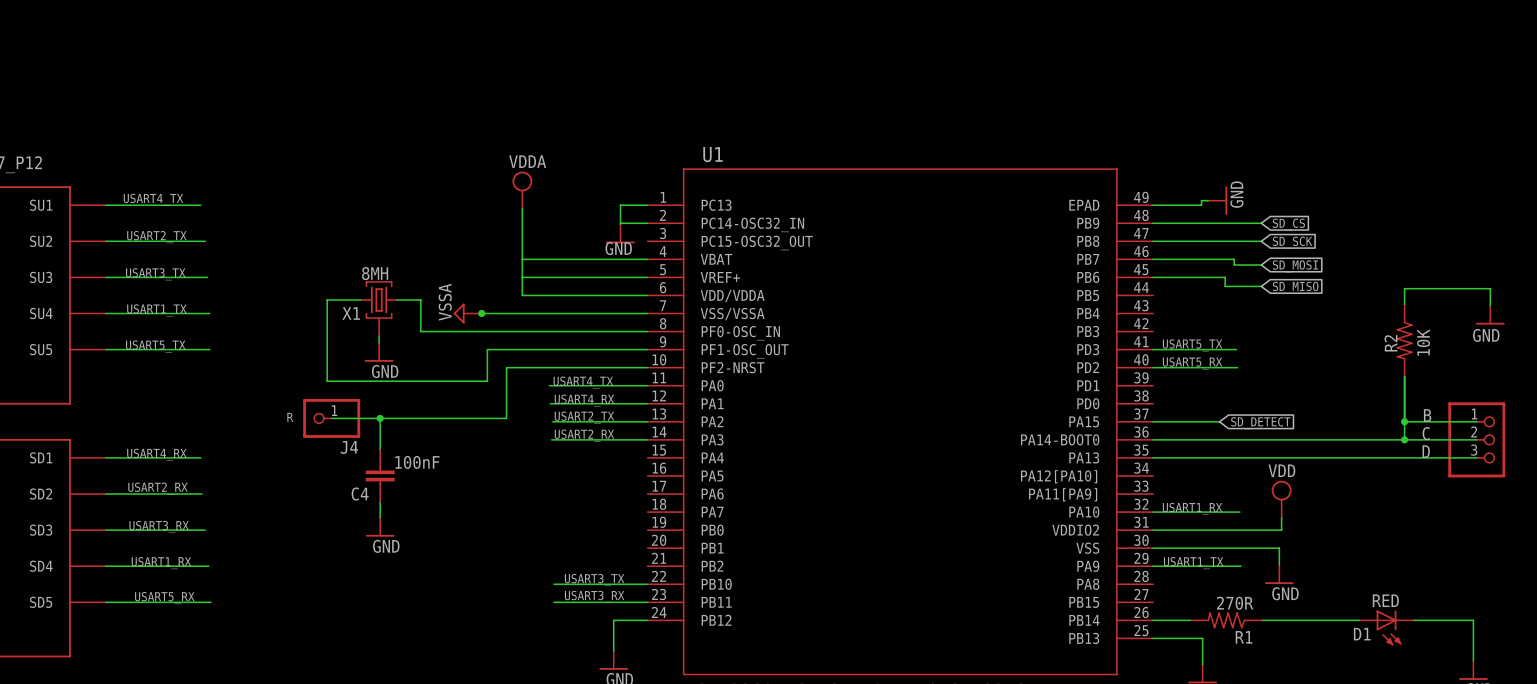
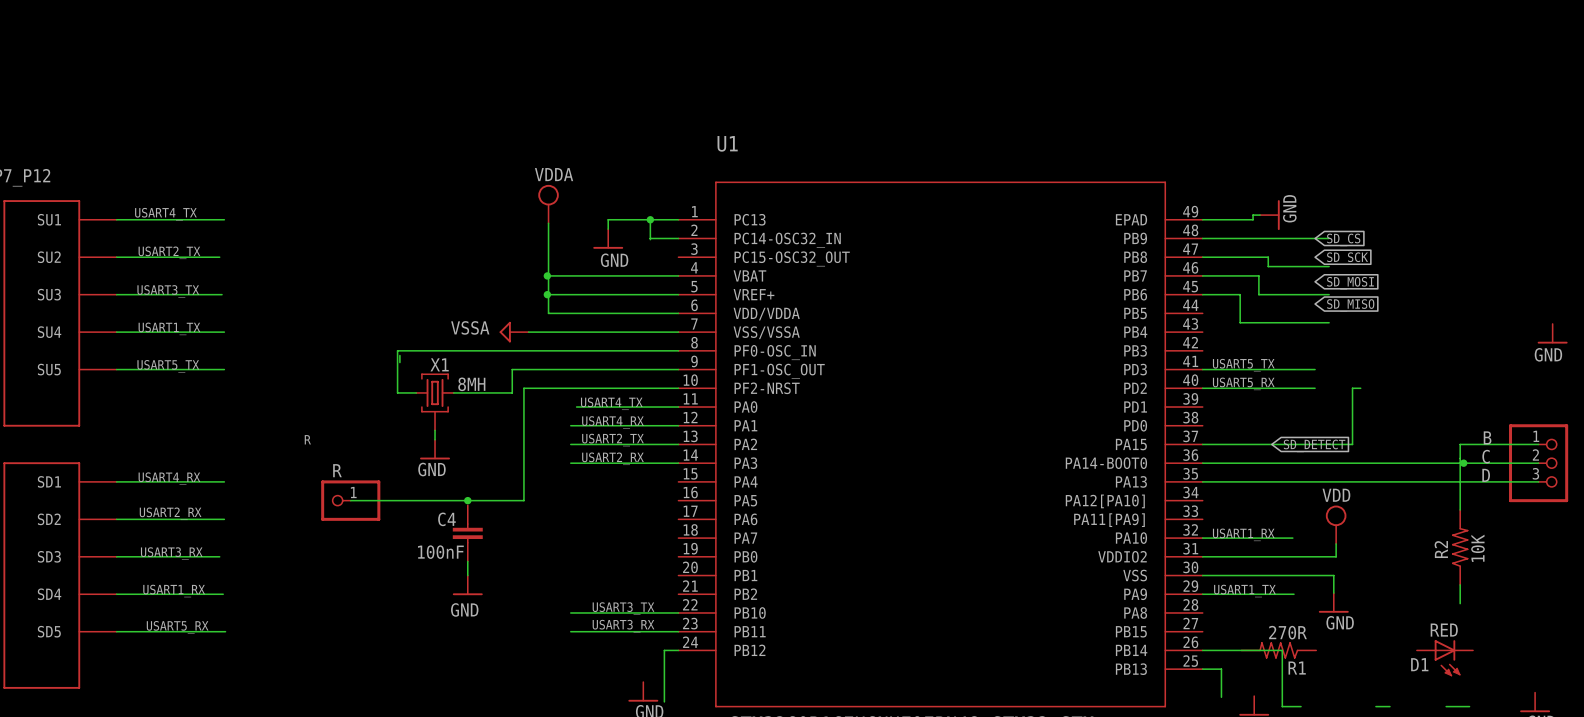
U1 name position: U1 (713, 154) -> U1 (727, 143)
wire: none -> (215, 219) (224, 219)
wire: none -> (650, 219) (608, 219) (608, 229)
junction: none -> (650, 219)
wire: none -> (1315, 238) (1329, 238)
power symbol position: GND (620, 233) -> GND (608, 238)
wire: (1216, 241) (1261, 241) -> (1268, 257) (1268, 266) (1329, 266)
power symbol text position: GND (618, 248) -> GND (614, 260)
junction: none -> (547, 275)
wire: (1207, 259) (1234, 259) (1234, 265) (1261, 265) -> none
X1 value position: 8MH (375, 273) -> 8MH (471, 384)
junction: none -> (547, 294)
wire: (1189, 277) (1207, 277) -> (1258, 275) (1258, 294)
wire: none -> (1240, 294) (1240, 322) (1329, 322)
wire: (1225, 277) (1225, 286) (1261, 286) -> (1277, 294) (1329, 294)
wire: (361, 299) (327, 299) (327, 381) (487, 381) (487, 372) -> (453, 392) (512, 392)
wire: (397, 299) (420, 299) (420, 331) -> (416, 392) (397, 392) (397, 350) (443, 350)
power symbol text rotation: 0° (445, 302) -> 90° clockwise (470, 327)
wire: (1404, 304) (1404, 288) (1490, 288) (1490, 305) -> none
X1 position: (379, 308) -> (435, 402)
X1 name position: X1 (351, 313) -> X1 (439, 364)
power symbol position: VSSA (467, 313) -> VSSA (514, 332)
junction: (481, 313) -> none
R2 rotation: 0° (1404, 340) -> 180° (1460, 547)
R2 position: (1404, 340) -> (1460, 547)
wire: none -> (1289, 369) (1315, 369)
power symbol: GND (379, 352) -> none
wire: (506, 367) (506, 418) (331, 418) -> (532, 388) (523, 388) (523, 500) (350, 500)
wire: none -> (1290, 388) (1315, 388)
wire: none -> (1360, 388) (1352, 388) (1352, 444) (1271, 444)
wire: (1404, 376) (1404, 439) -> none
wire: none -> (570, 425) (577, 425)
wire: none -> (435, 430) (435, 439)
J4: (331, 418) -> none
wire: (380, 418) (380, 448) -> none
junction: (380, 418) -> none
wire: none -> (570, 444) (580, 444)
wire: none -> (1463, 444) (1460, 444) (1460, 509)
junction: (1404, 421) -> none
power symbol: none -> GND (435, 449)
wire: none -> (570, 463) (578, 463)
text: none -> R (337, 470)
wire: none -> (215, 481) (224, 481)
C4 value position: 100nF (417, 462) -> 100nF (440, 552)
part: none -> (350, 500)
C4 position: (380, 475) -> (467, 533)
junction: none -> (467, 500)
wire: none -> (216, 519) (224, 519)
C4 name position: C4 (360, 494) -> C4 (446, 519)
wire: (380, 503) (380, 517) -> none
power symbol: GND (380, 527) -> none
wire: none -> (467, 561) (467, 575)
power symbol: none -> GND (467, 585)
wire: none -> (1460, 584) (1460, 603)
wire: none -> (570, 612) (581, 612)
wire: none -> (570, 631) (581, 631)
wire: (634, 620) (613, 620) (613, 650) -> (664, 650) (664, 701)
wire: none -> (1241, 650) (1282, 650) (1282, 706) (1301, 706)
wire: (1262, 620) (1359, 620) -> none
wire: (1413, 620) (1473, 620) (1473, 660) -> none
wire: (1171, 638) (1202, 638) (1202, 664) -> (1221, 669) (1221, 697)
wire: none -> (1375, 706) (1389, 706)
wire: none -> (1446, 706) (1469, 706)

